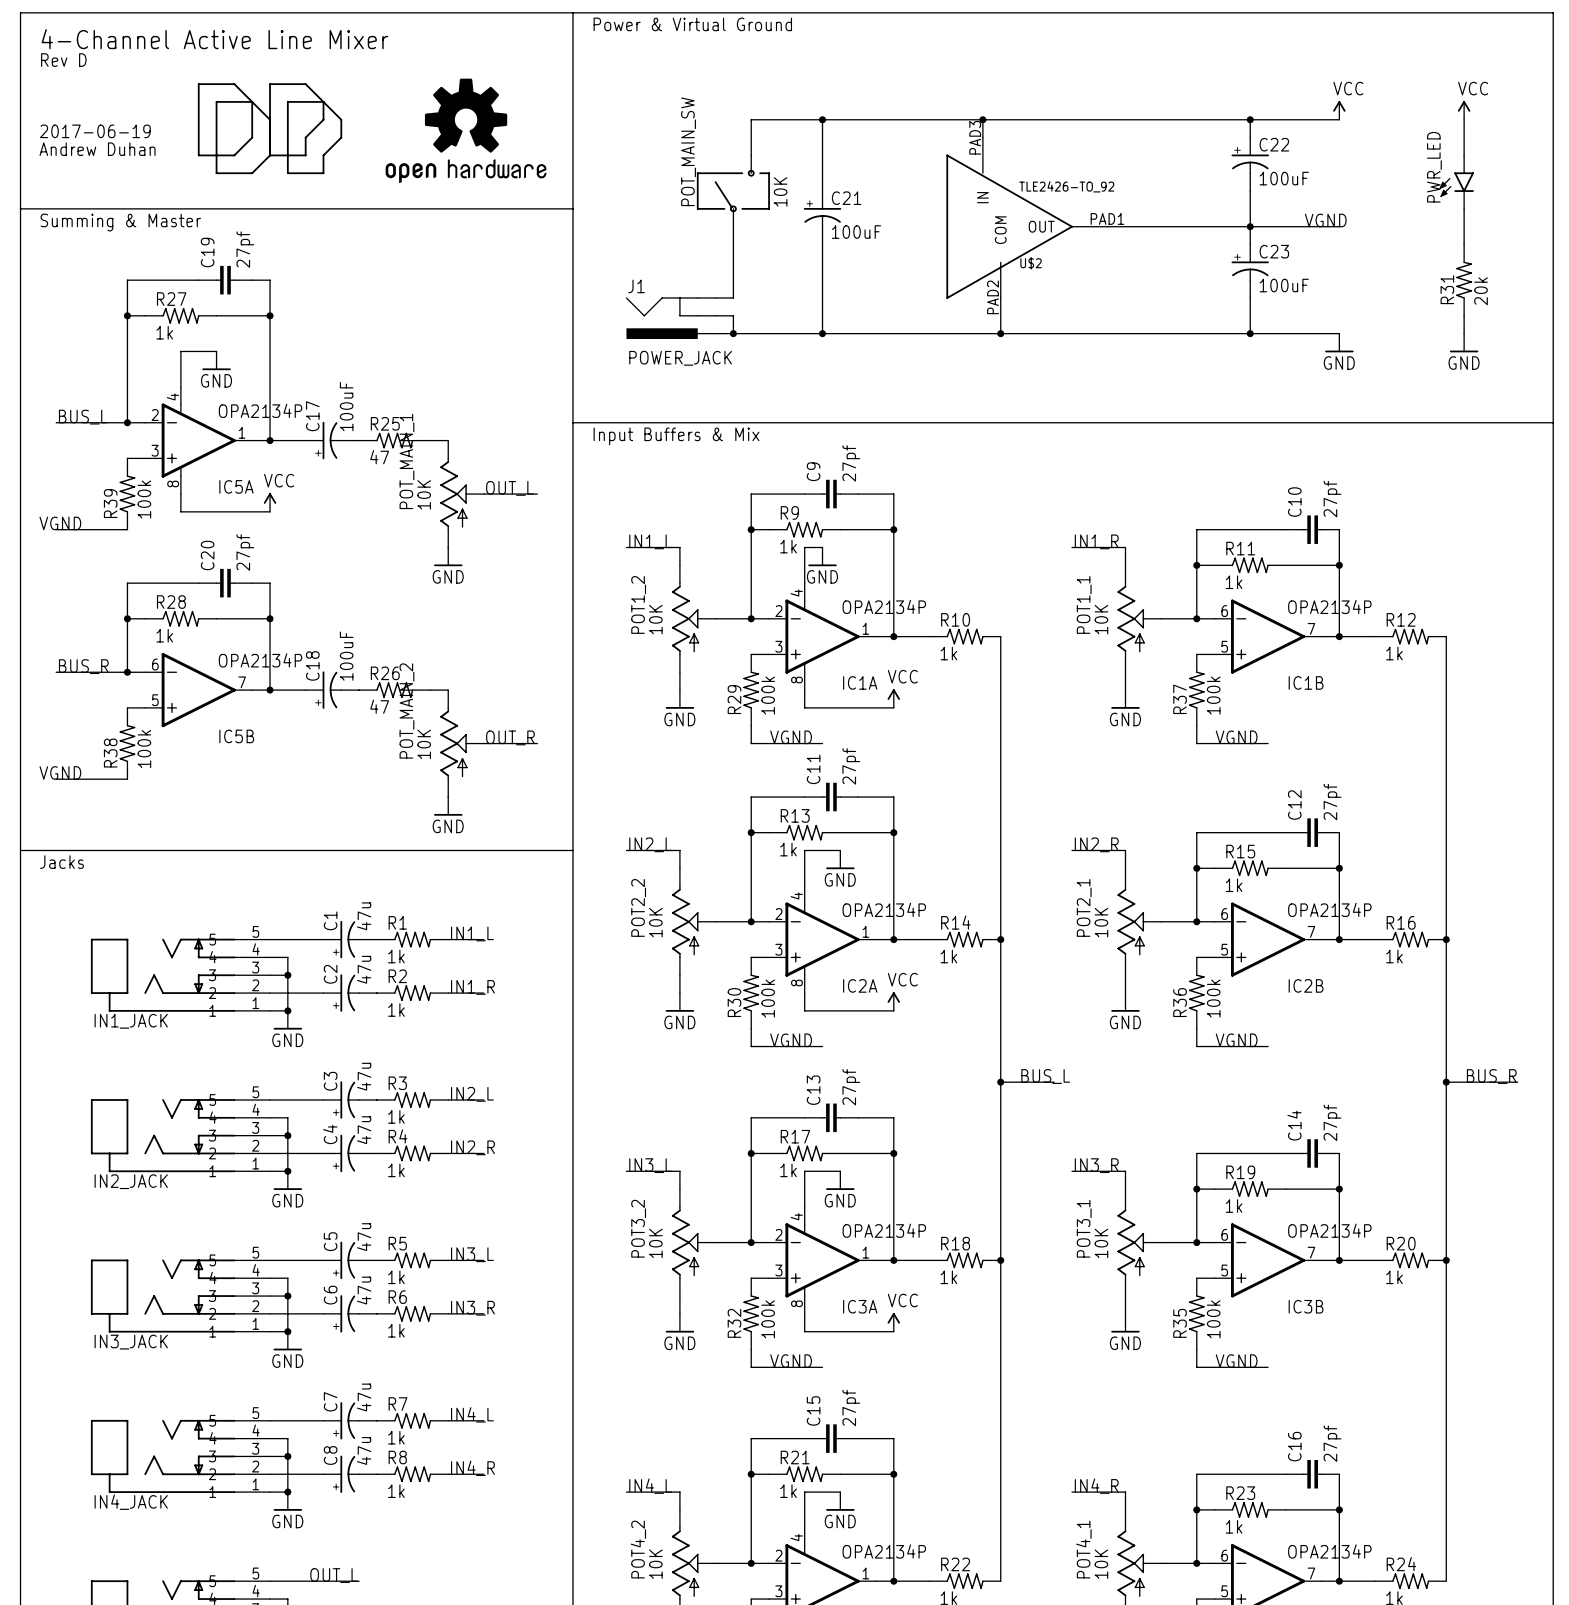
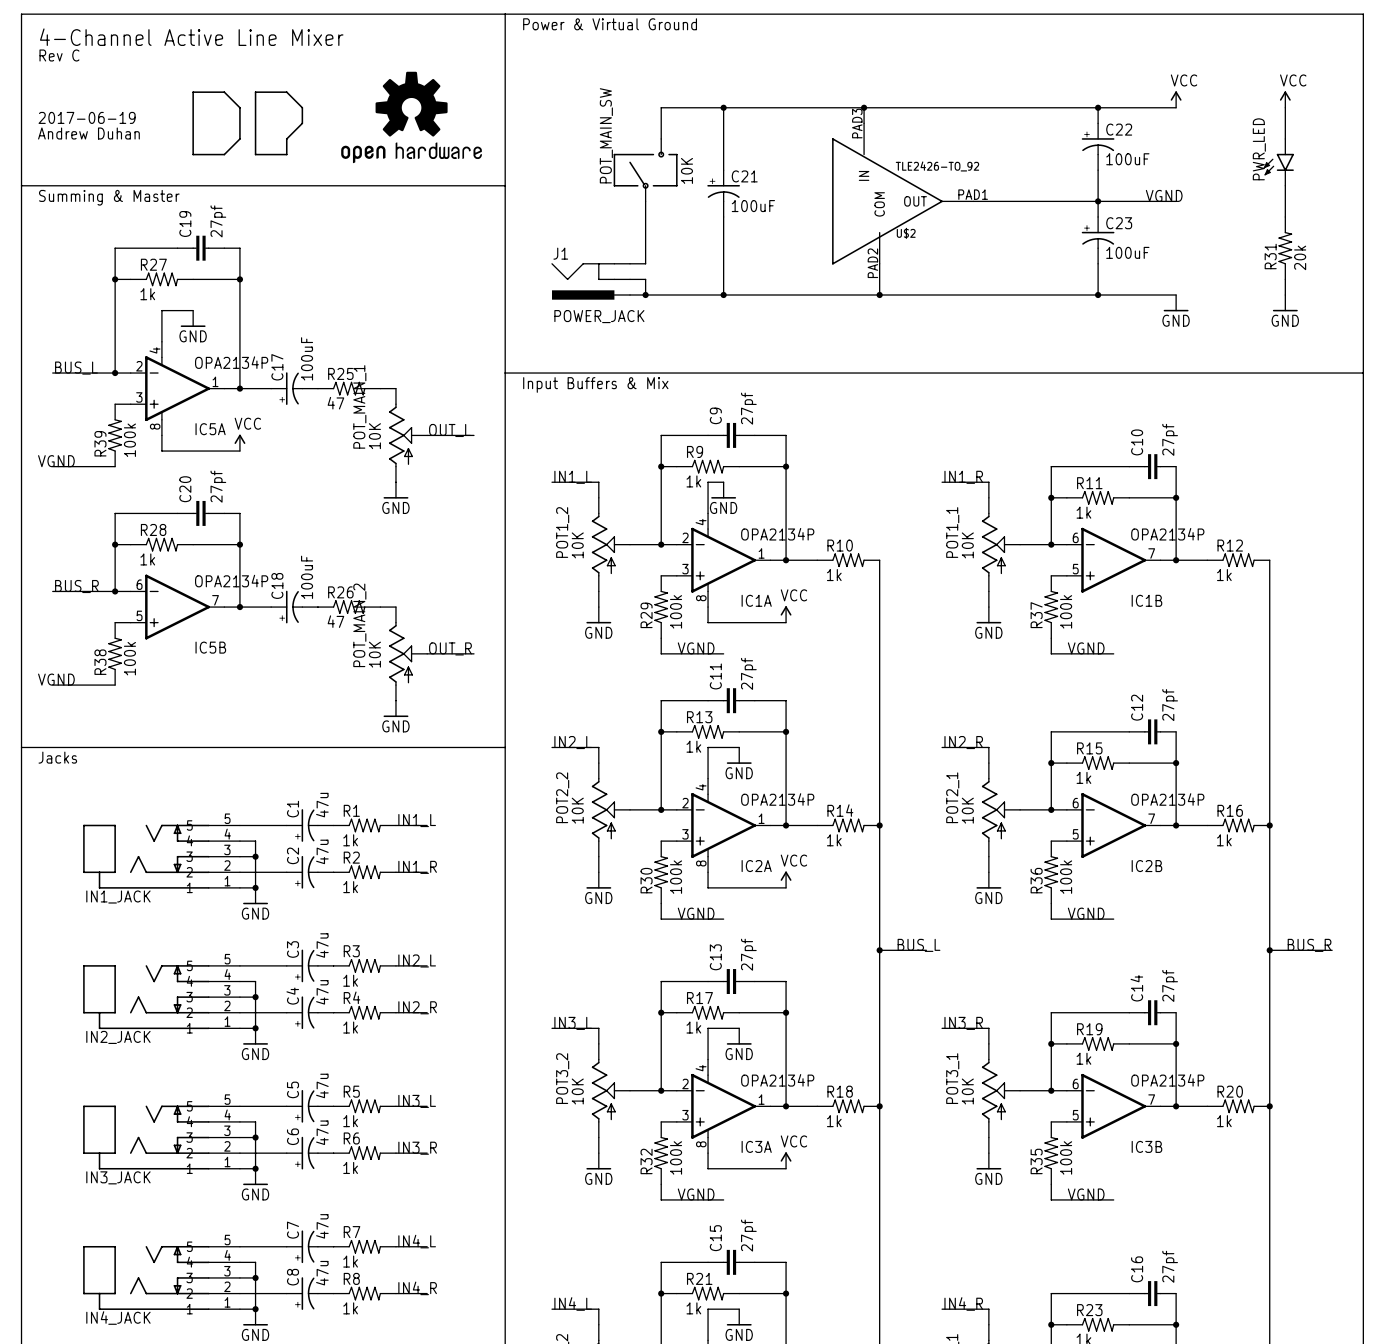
text: Rev D (63, 60) -> Rev C (59, 55)
part: (261, 119) -> none

